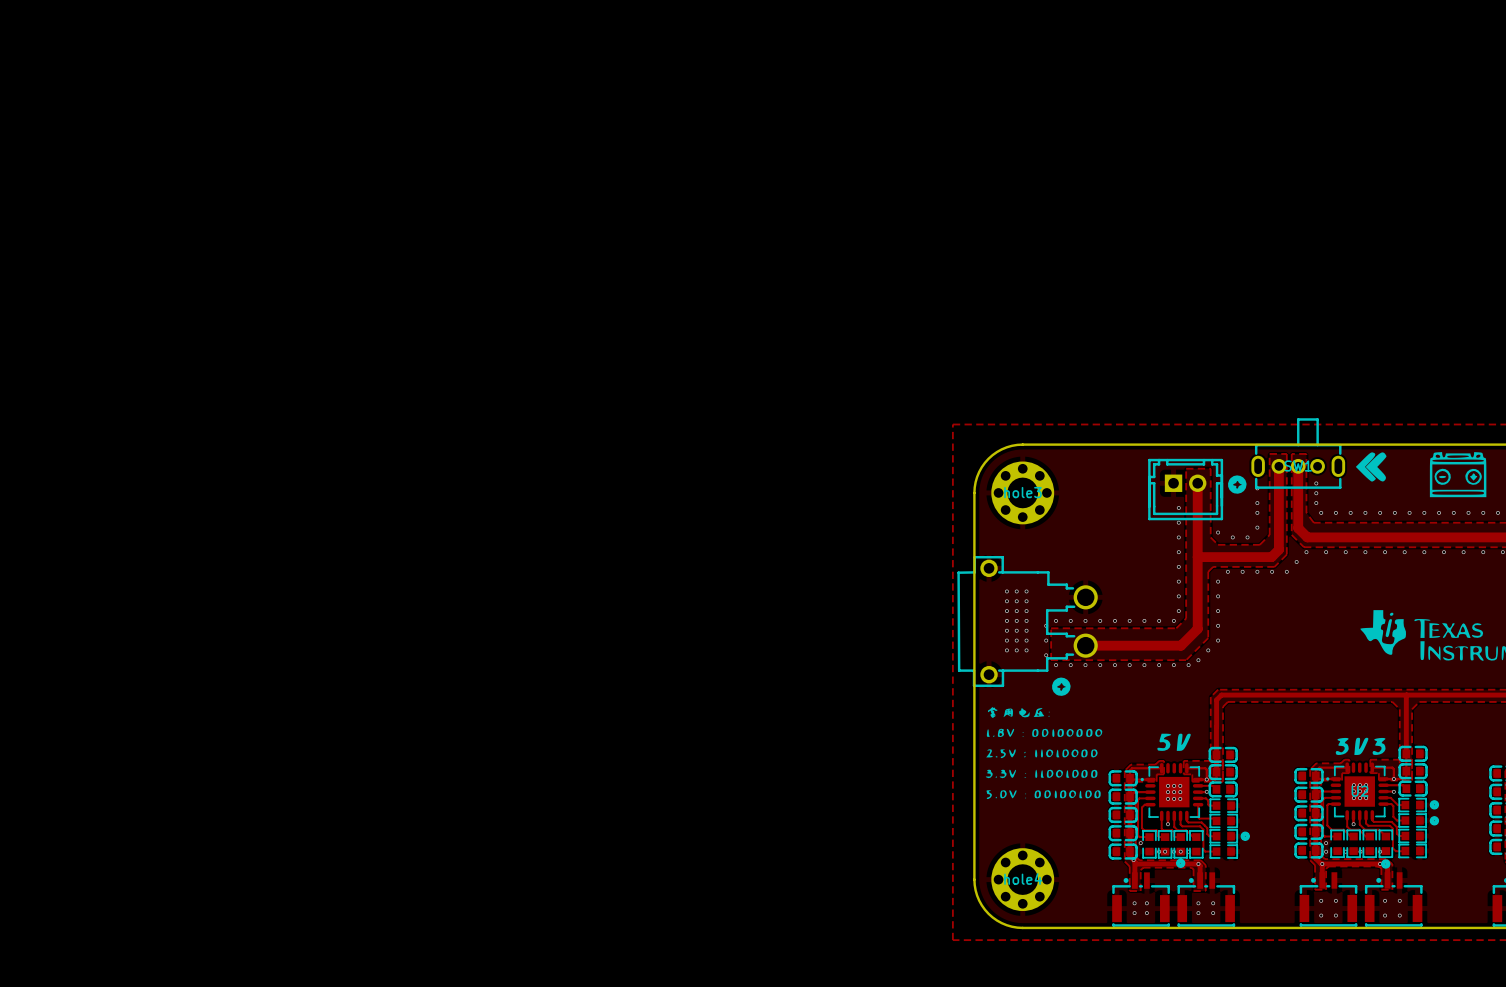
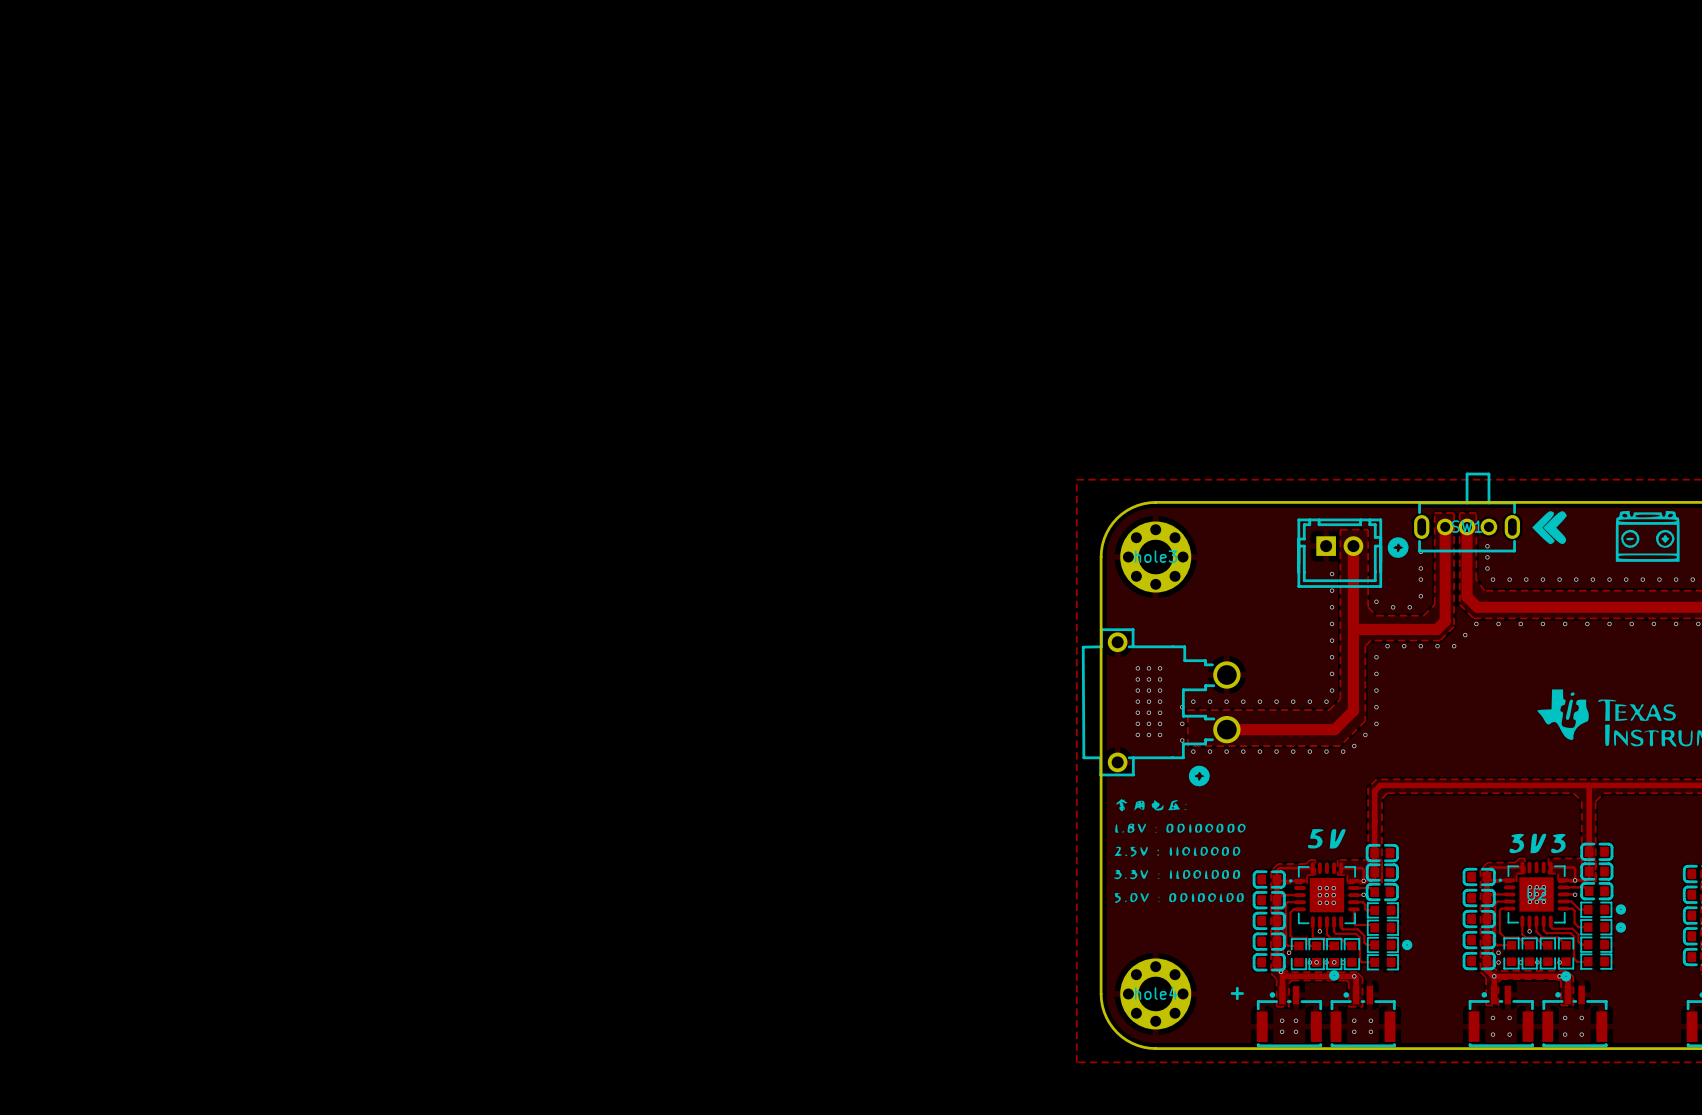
text: none -> + (1237, 993)

